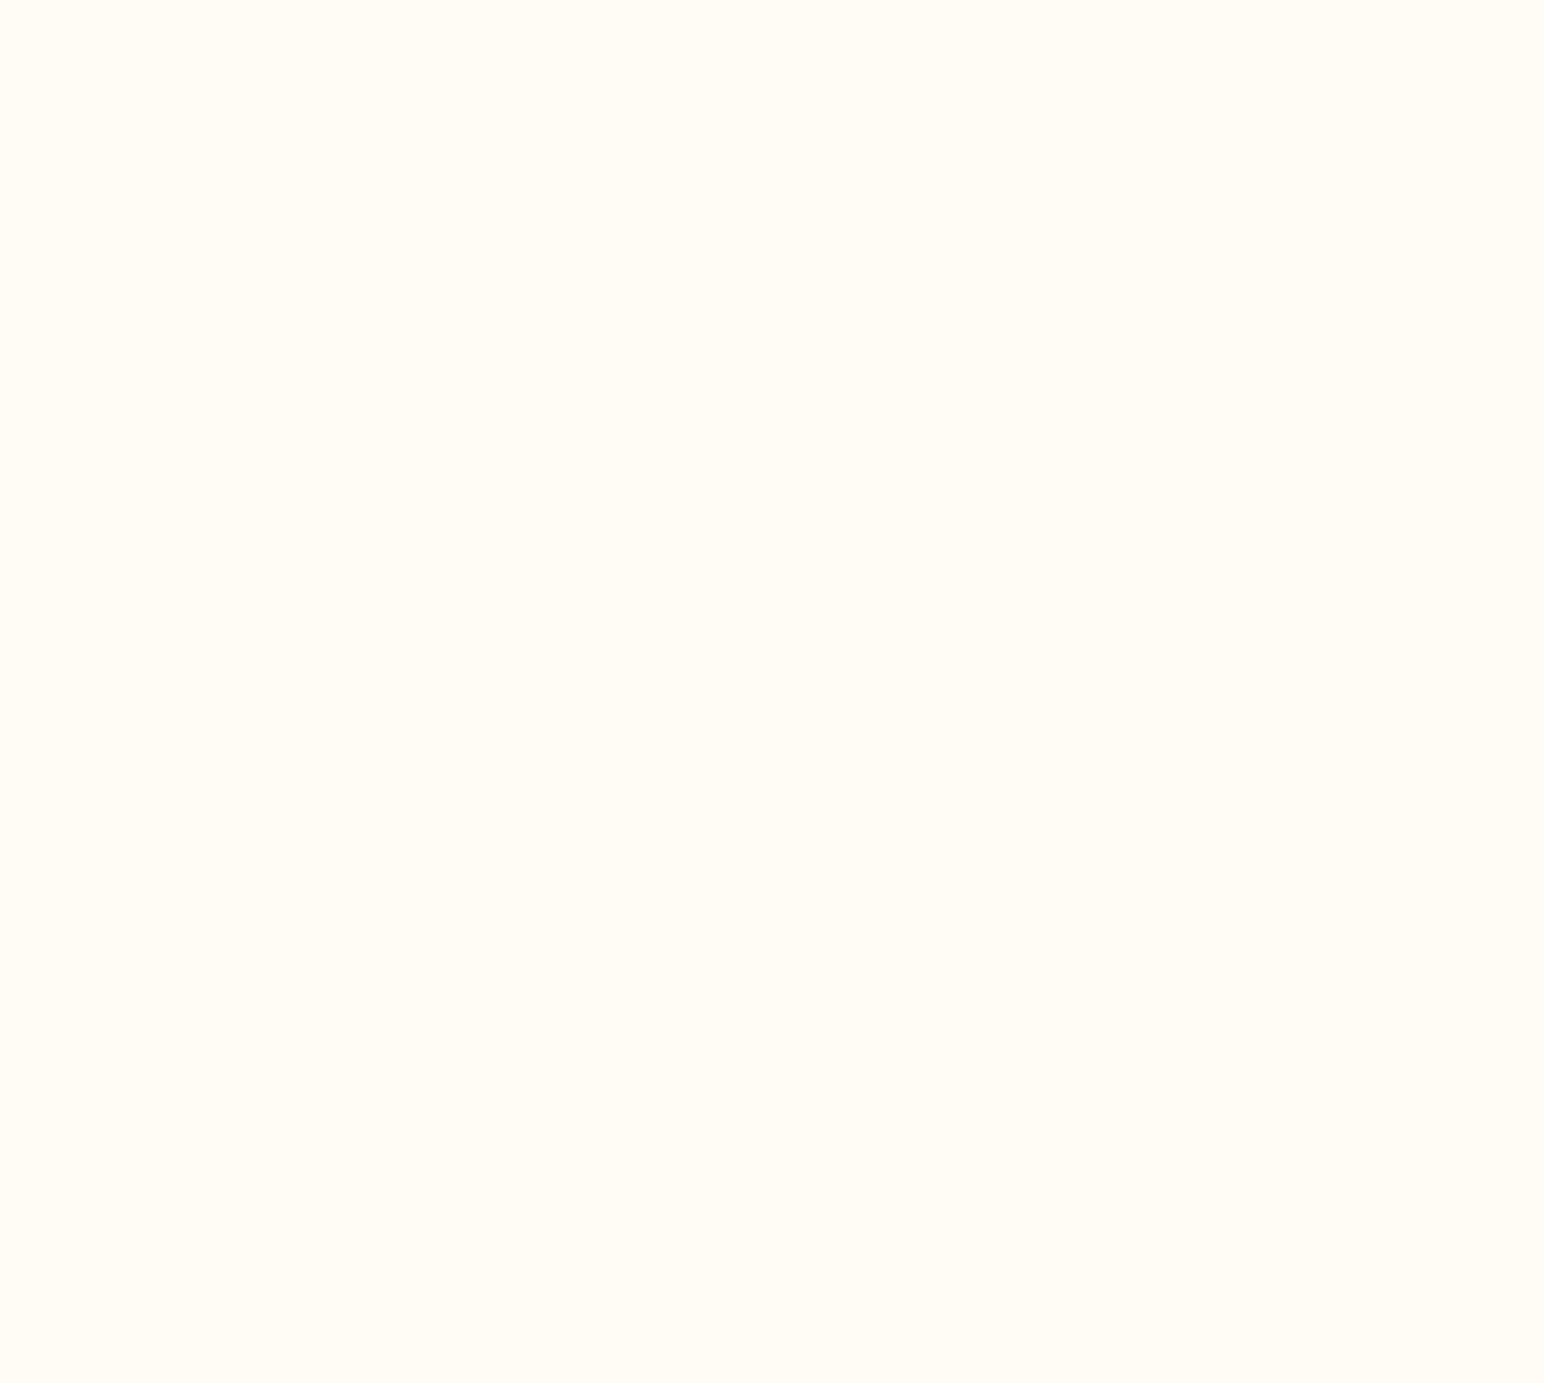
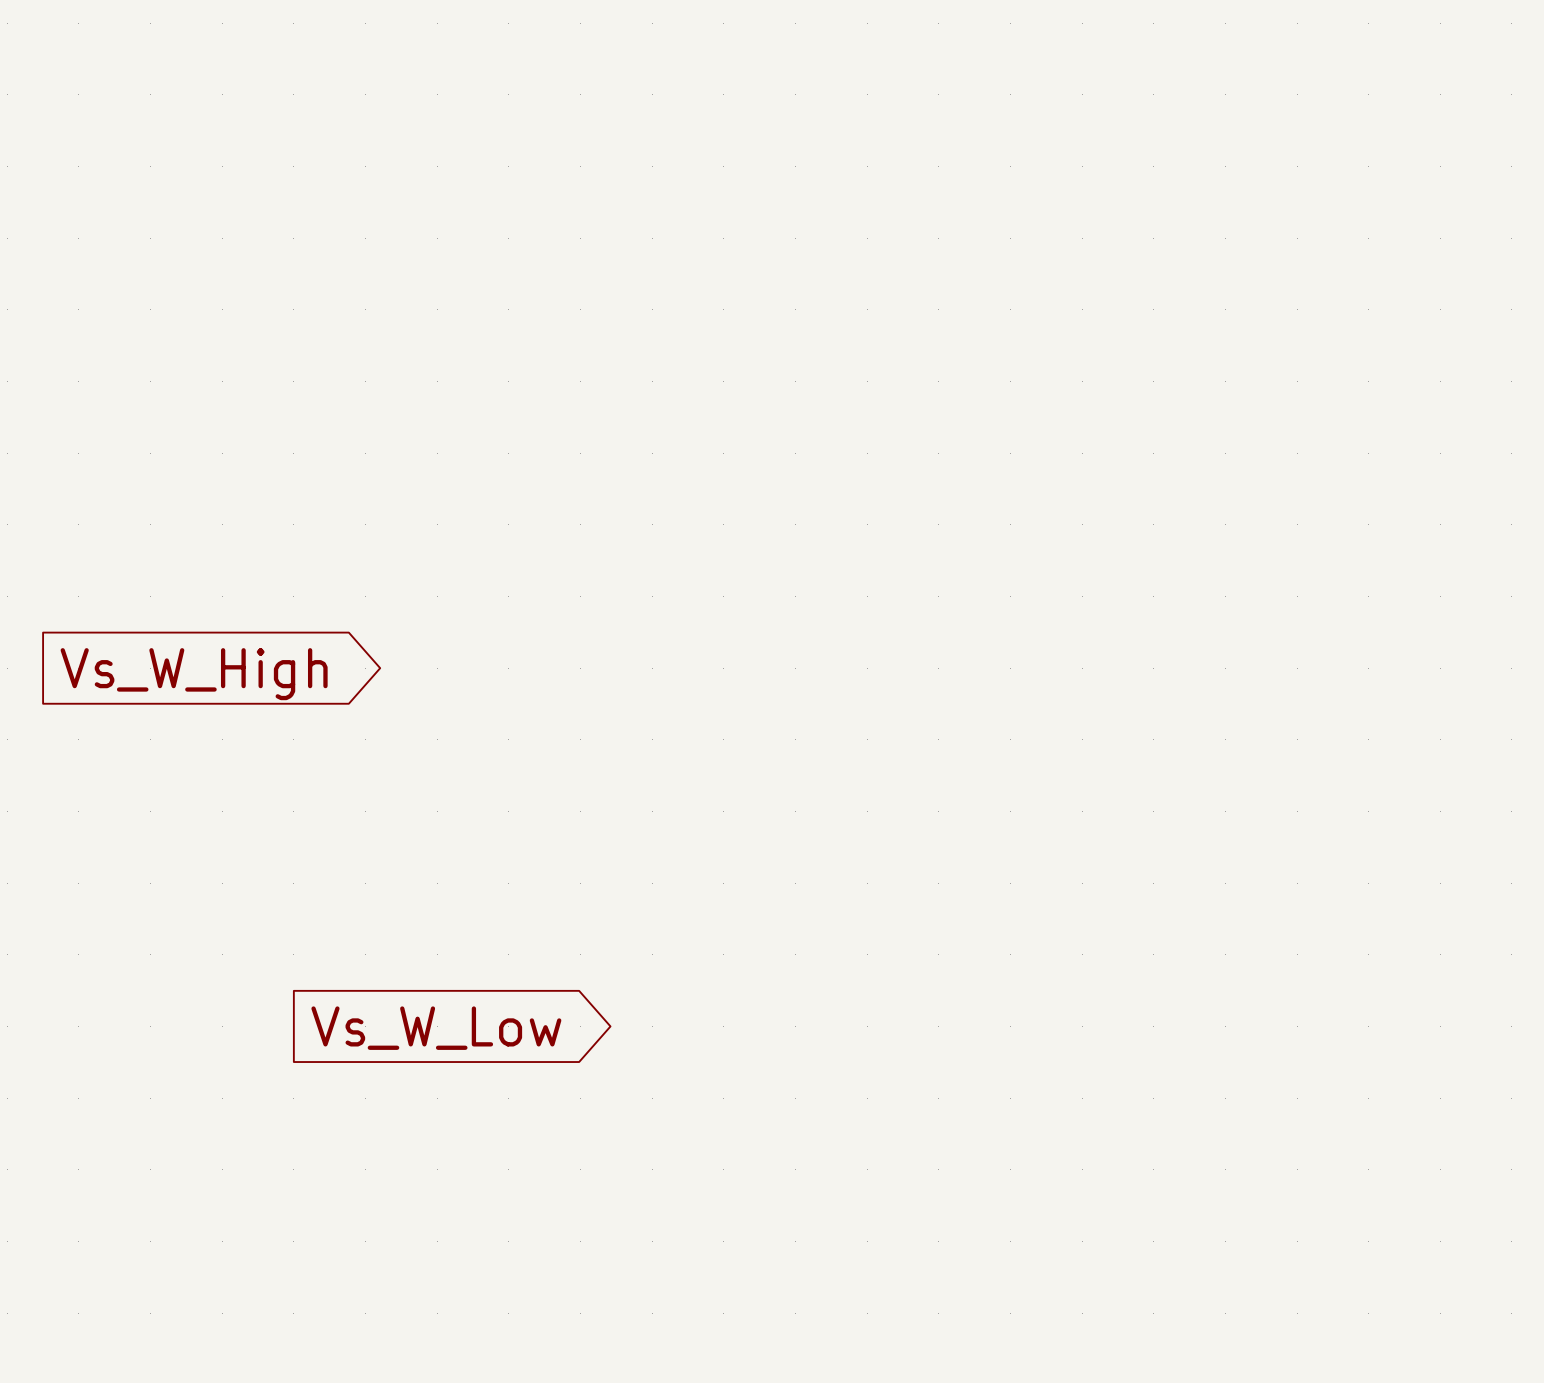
global label: none -> Vs_W_High (194, 674)
global label: none -> Vs_W_Low (436, 1028)

